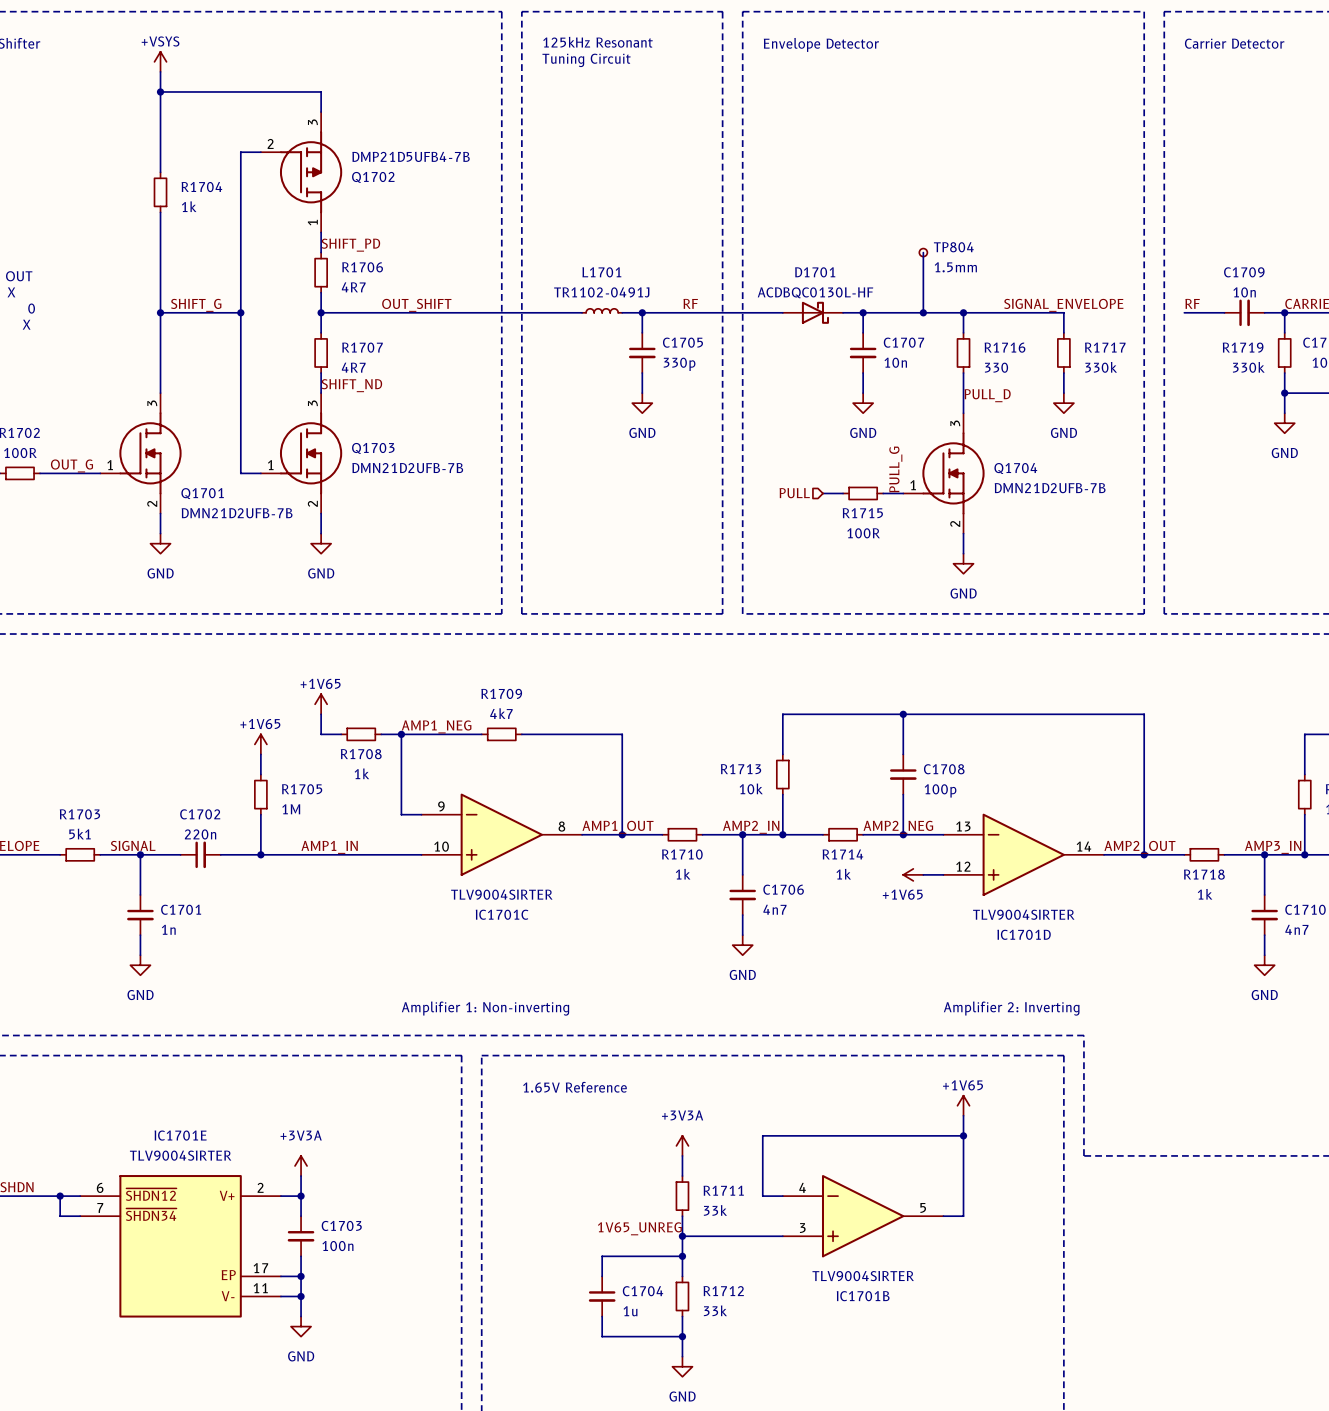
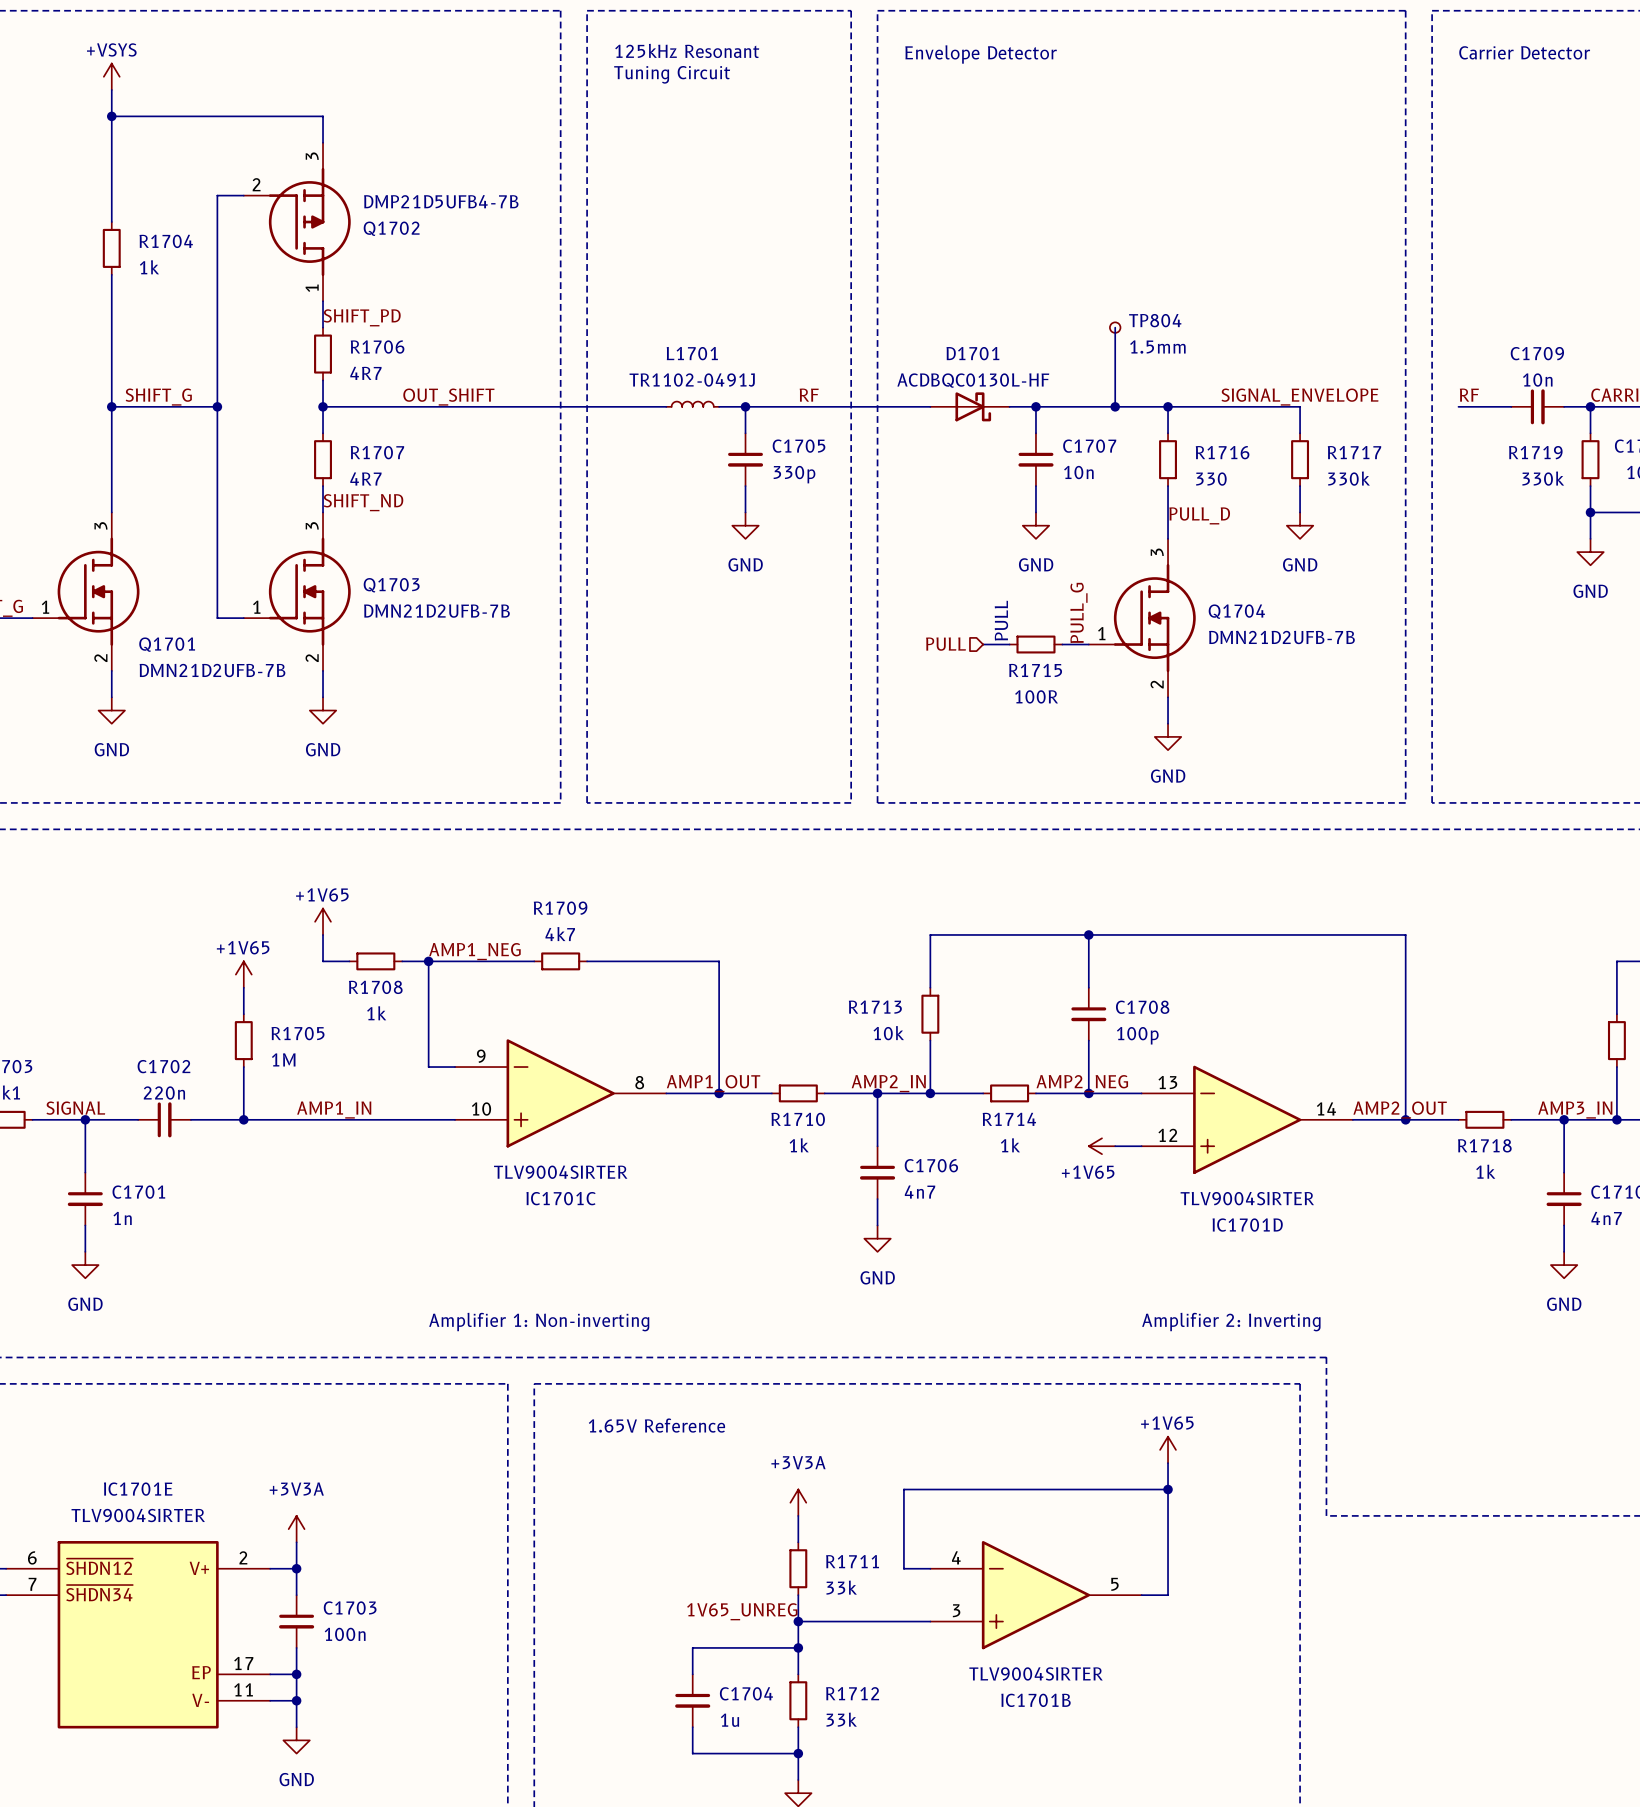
text: none -> PULL (1001, 620)

